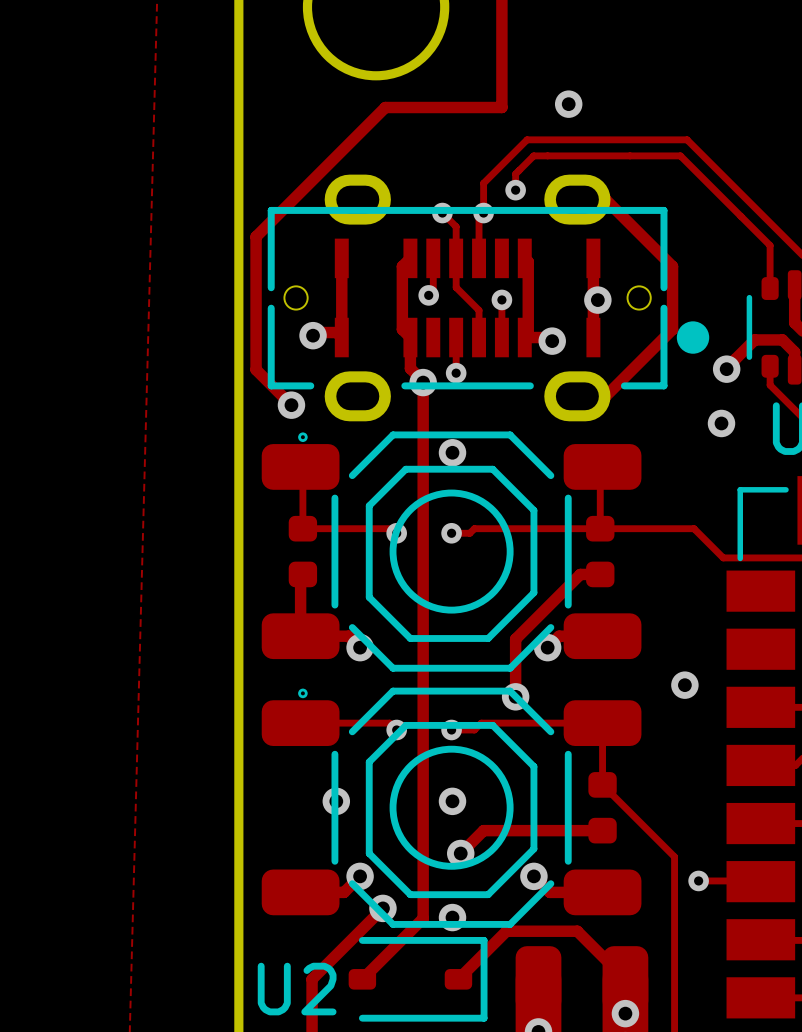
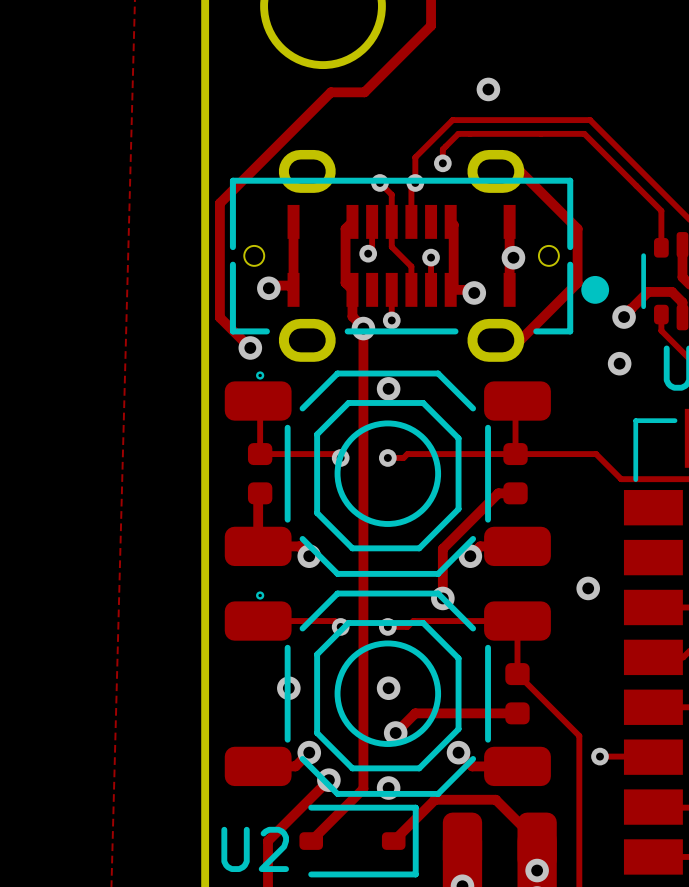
track: (501, 30) (501, 107) (424, 107) -> (431, 25) (364, 92)

